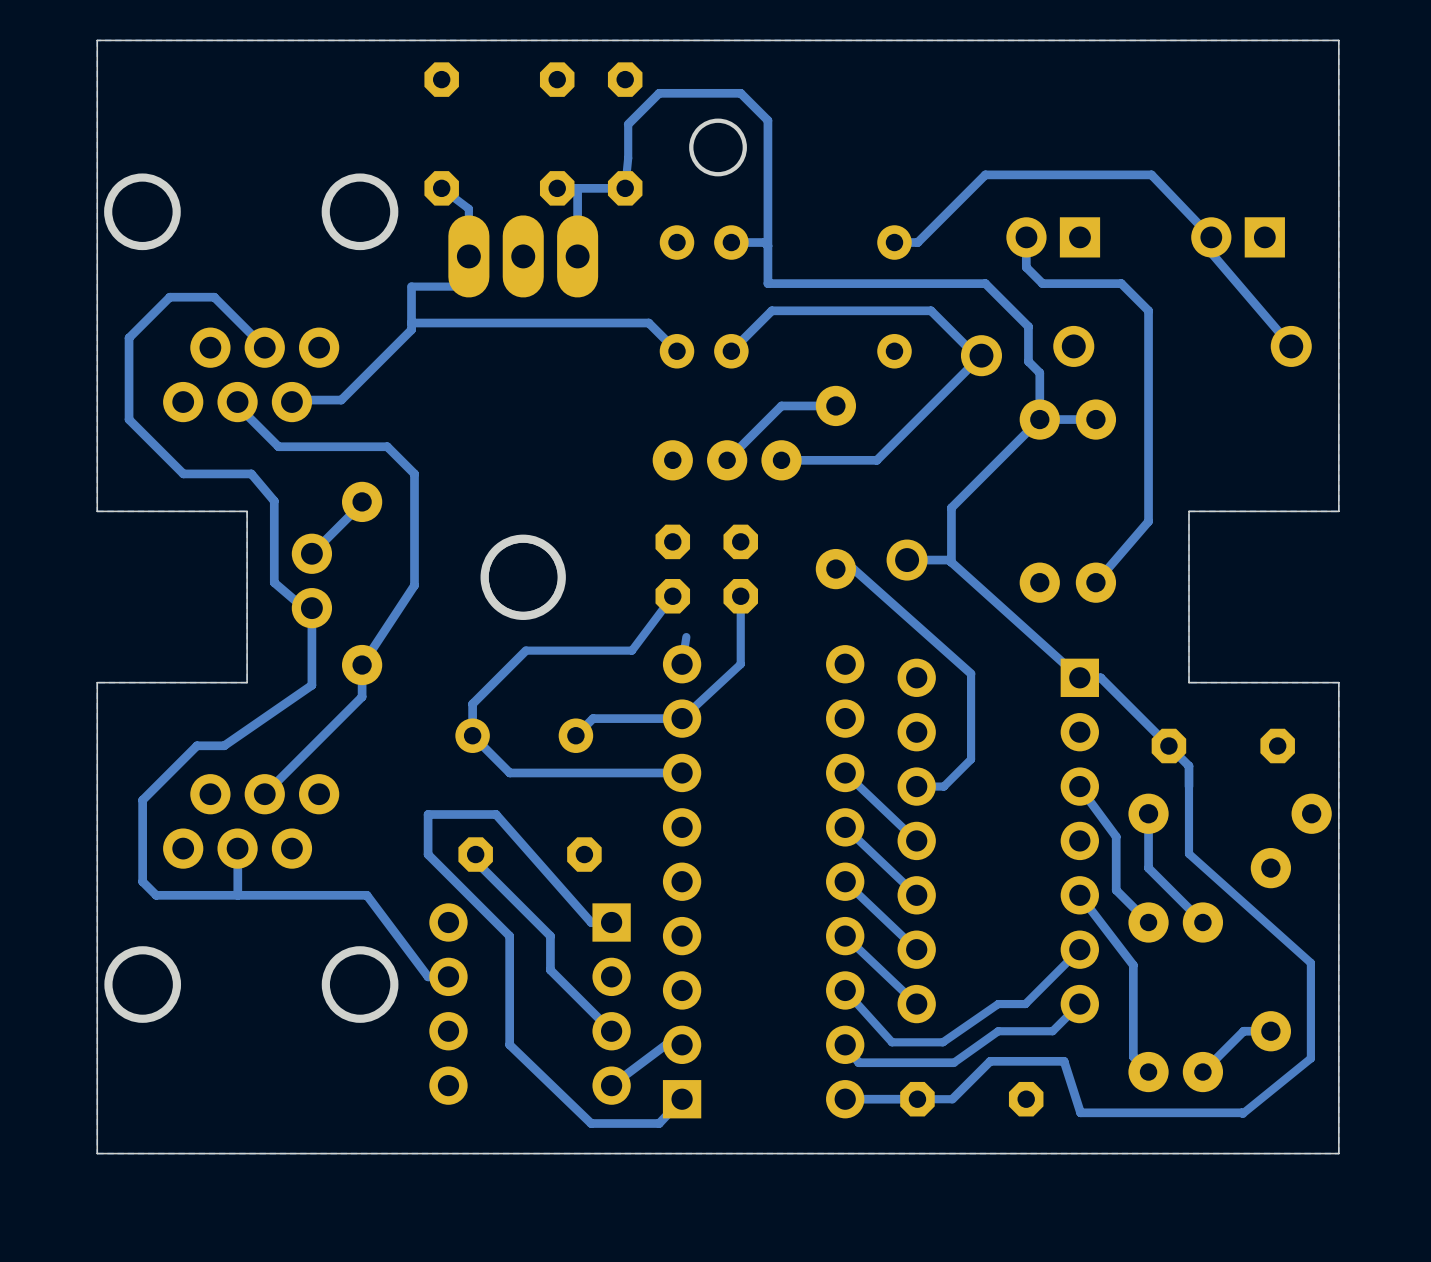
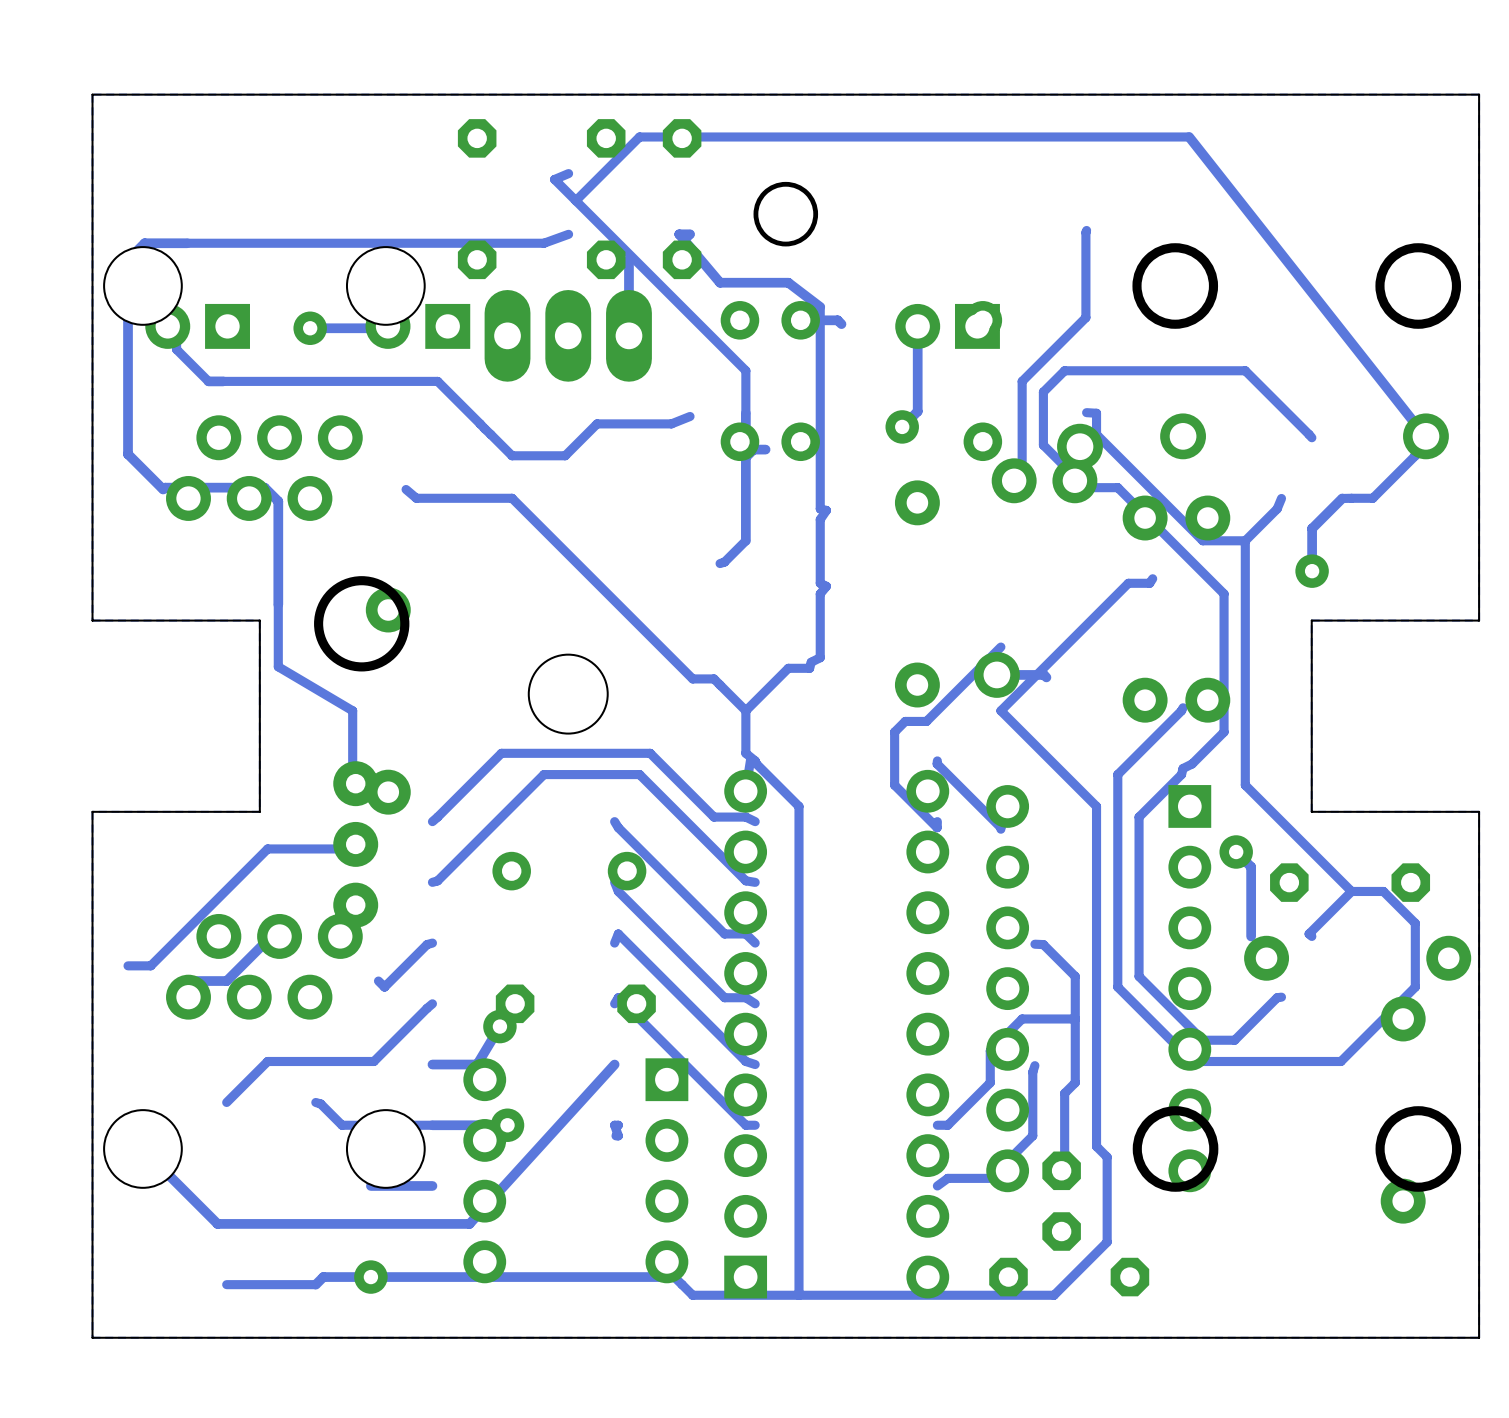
track: none -> (568, 173) (554, 179) (745, 370) (745, 540) (724, 562) (720, 563)
track: none -> (575, 200) (639, 136) (1189, 136) (1415, 423) (1415, 455) (1372, 498) (1342, 498) (1312, 528) (1312, 571)
track: none -> (1086, 230) (1085, 317) (1022, 381) (1022, 477) (1014, 480)
track: none -> (568, 234) (543, 243) (144, 243) (128, 259) (128, 426)
round board edge: [104, 173, 181, 251] -> none
round board edge: [321, 173, 399, 251] -> none
track: none -> (682, 243) (690, 234) (679, 234) (720, 282) (788, 282) (820, 307) (820, 508) (826, 510) (820, 519) (820, 583) (826, 586) (820, 593) (820, 657) (811, 662) (809, 668) (788, 668) (745, 710)
round board edge: none -> [1132, 243, 1219, 329]
round board edge: none -> [1375, 243, 1462, 329]
track: (441, 188) (468, 208) (468, 256) (471, 233) (471, 286) (411, 286) (411, 329) (341, 400) (293, 400) (291, 402) -> none
track: (557, 188) (625, 188) (628, 158) (628, 124) (659, 93) (740, 93) (767, 120) (767, 283) (985, 283) (1028, 326) (1028, 361) (1039, 372) (1039, 433) -> none
track: (1026, 237) (1026, 267) (1042, 283) (1121, 283) (1148, 310) (1148, 521) (1095, 582) -> none
part: (1053, 237) -> none
part: (1238, 237) -> none
track: (894, 242) (917, 242) (985, 174) (1151, 174) (1211, 237) (1211, 252) (1291, 346) -> none
part: none -> (197, 326)
track: none -> (387, 326) (393, 328) (310, 328)
part: none -> (417, 326)
track: none -> (917, 326) (917, 411) (902, 426)
part: none -> (947, 326)
via: none -> (310, 328)
track: (201, 297) (169, 297) (129, 337) -> (208, 381) (176, 349) (176, 328) (167, 326)
track: (214, 297) (264, 347) -> (223, 381) (437, 381) (512, 455) (565, 455) (597, 423) (671, 423) (690, 416)
track: (411, 323) (648, 323) (677, 351) -> none
track: none -> (1086, 412) (1096, 413) (1096, 434) (1202, 540) (1245, 540)
via: none -> (902, 426)
track: none -> (1311, 437) (1245, 370) (1064, 370) (1043, 392) (1043, 445) (1075, 477) (1075, 487) (1117, 487) (1224, 593) (1224, 732) (1192, 763) (1183, 768) (1181, 774) (1139, 817) (1139, 976) (1202, 1040) (1234, 1040) (1277, 997) (1281, 997)
track: (731, 351) (771, 310) (931, 310) (975, 355) (981, 355) (876, 460) (781, 460) -> none
track: none -> (765, 449) (753, 449) (745, 457)
track: (129, 362) (129, 419) (183, 473) (251, 473) (274, 501) (274, 582) (304, 608) (311, 608) (311, 685) (224, 745) (197, 745) (142, 800) (142, 881) (156, 895) (366, 895) (428, 976) (448, 976) -> (128, 454) (163, 489) (165, 487) (264, 487) (278, 501) (278, 666) (352, 710) (352, 774) (355, 783)
part: none -> (1044, 480)
track: none -> (406, 489) (416, 498) (512, 498) (692, 678) (713, 678) (745, 710)
track: (237, 402) (237, 405) (278, 446) (387, 446) (414, 473) (414, 585) (362, 665) (362, 696) (264, 794) -> none
track: none -> (1281, 498) (1277, 508) (1245, 540)
track: (835, 405) (781, 405) (727, 460) -> none
track: (1095, 419) (1039, 419) (951, 507) (951, 562) (1079, 677) (1100, 677) (1189, 766) (1189, 853) (1310, 962) (1310, 1058) (1242, 1113) (1080, 1112) (1064, 1061) (990, 1061) (952, 1099) (845, 1099) -> none
track: none -> (1245, 540) (1245, 785) (1351, 891)
part rotation: 0° (727, 460) -> 90° clockwise (355, 844)
part position: (727, 460) -> (355, 844)
via: none -> (1312, 571)
track: none -> (1152, 578) (1149, 583) (1128, 583) (1000, 710) (1096, 806) (1096, 1146) (1107, 1157) (1107, 1242) (1054, 1295) (692, 1295) (674, 1277) (323, 1277) (315, 1284) (226, 1284)
track: (362, 501) (311, 553) -> none
track: none -> (1000, 647) (926, 721) (905, 721) (894, 732) (894, 785) (937, 827) (937, 821)
part: (672, 569) -> none
part: (740, 569) -> none
track: (835, 569) (853, 569) (971, 673) (971, 759) (943, 786) (916, 786) -> none
round board edge position: (523, 577) -> (361, 623)
part: (311, 580) -> none
track: none -> (1183, 707) (1117, 774) (1117, 987) (1192, 1061) (1340, 1061) (1415, 987) (1415, 923) (1383, 891) (1351, 891)
track: none -> (745, 710) (745, 753) (798, 806) (798, 1295)
track: (672, 596) (631, 650) (525, 650) (472, 703) (472, 735) (509, 772) (682, 772) -> none
track: (740, 596) (740, 664) (682, 718) (593, 718) (575, 735) -> none
track: none -> (937, 760) (937, 763) (1000, 829)
track: none -> (614, 821) (618, 827) (724, 933) (745, 933) (755, 943)
track: none -> (755, 821) (745, 817) (713, 817) (650, 753) (501, 753) (432, 821)
track: none -> (355, 844) (352, 848) (267, 848) (150, 965) (128, 965)
track: none -> (1236, 851) (1251, 866) (1251, 936)
via: none -> (1236, 851)
track: none -> (614, 882) (618, 891) (724, 997) (745, 997) (755, 1003)
track: none -> (755, 882) (745, 880) (639, 774) (543, 774) (437, 880) (432, 882)
track: none -> (1351, 891) (1309, 933) (1311, 936)
track: (845, 772) (916, 840) -> none
track: none -> (279, 927) (226, 981) (196, 981)
track: (1079, 786) (1116, 836) (1116, 890) (1148, 922) -> none
track: none -> (432, 943) (427, 944) (384, 987) (378, 981)
track: none -> (614, 943) (618, 933) (745, 1061) (755, 1064)
track: none -> (1034, 944) (1043, 944) (1075, 976) (1075, 1082) (1064, 1093) (1064, 1167) (1061, 1170)
track: (1148, 813) (1148, 868) (1202, 922) -> none
track: (845, 827) (916, 895) -> none
track: (237, 848) (237, 895) -> none
track: none -> (432, 1003) (373, 1061) (267, 1061) (226, 1102)
track: (475, 854) (475, 861) (550, 936) (550, 970) (611, 1031) -> none
track: none -> (614, 1003) (618, 997) (745, 1125) (755, 1125)
track: none -> (1075, 1018) (1022, 1018) (990, 1050) (990, 1082) (947, 1125) (937, 1125)
track: none -> (499, 1026) (477, 1064) (432, 1064)
via: none -> (499, 1026)
track: (845, 881) (916, 949) -> none
track: (1079, 895) (1133, 965) (1133, 1056) (1148, 1072) -> none
track: none -> (614, 1064) (469, 1223) (217, 1223) (150, 1157) (128, 1148)
track: none -> (1034, 1065) (1032, 1072) (1032, 1135) (1000, 1167) (1000, 1178) (947, 1178) (937, 1185)
track: (611, 922) (591, 922) (496, 814) (428, 814) (428, 854) (509, 936) (509, 1044) (591, 1123) (659, 1123) (682, 1099) -> none
part: (1175, 922) -> none
track: (845, 936) (916, 1004) -> none
track: none -> (315, 1102) (320, 1103) (342, 1125) (507, 1125)
round board edge: [104, 946, 182, 1023] -> none
round board edge: [321, 946, 399, 1023] -> none
round board edge: none -> [1132, 1106, 1219, 1192]
round board edge: none -> [1375, 1106, 1462, 1192]
track: (1079, 949) (1025, 1004) (998, 1004) (942, 1042) (892, 1042) (845, 990) -> none
via: none -> (507, 1125)
track: none -> (615, 1126) (618, 1125) (614, 1125) (618, 1135) (615, 1135)
track: (1079, 1004) (1052, 1031) (998, 1031) (953, 1062) (858, 1062) (845, 1044) -> none
track: none -> (432, 1185) (370, 1185)
part: none -> (1061, 1201)
track: (1270, 1031) (1243, 1031) (1202, 1072) -> none
track: (682, 1044) (665, 1044) (611, 1085) -> none
part: (1175, 1072) -> none
via: none -> (370, 1277)

